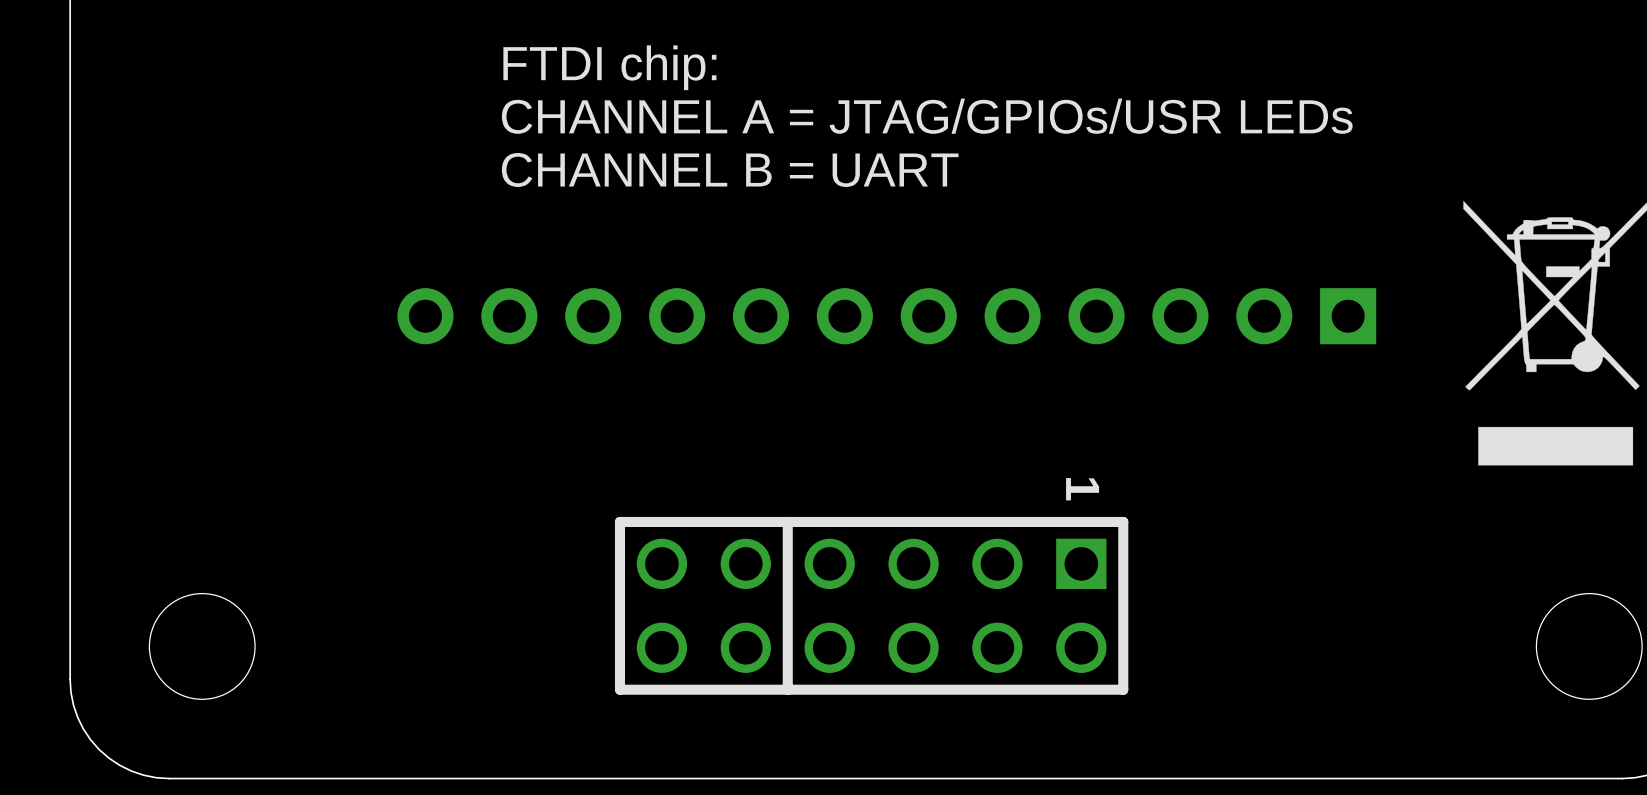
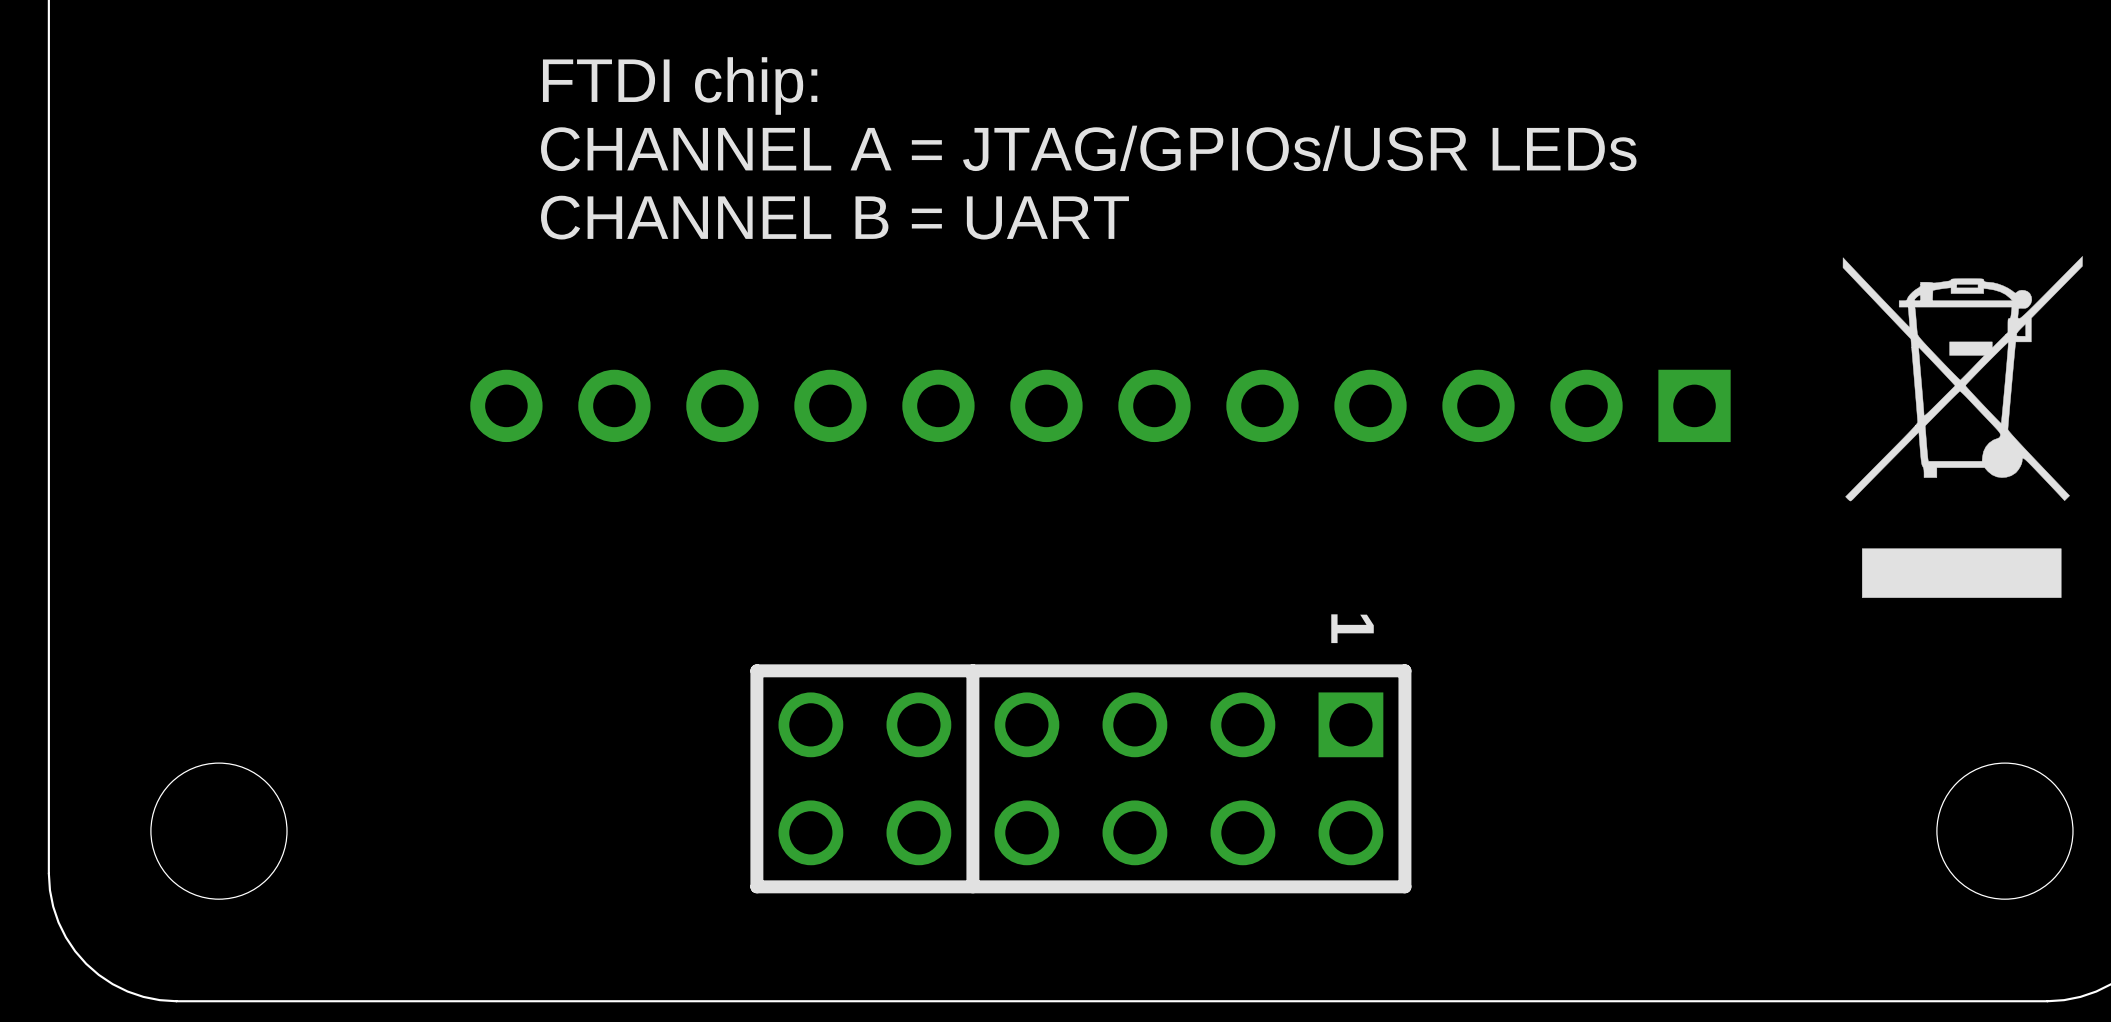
text position: FTDI chip: (609, 67) -> FTDI chip: (680, 85)
text position: CHANNEL A = JTAG/GPIOs/USR LEDs (927, 116) -> CHANNEL A = JTAG/GPIOs/USR LEDs (1088, 148)
text position: CHANNEL B = UART (730, 169) -> CHANNEL B = UART (834, 217)

